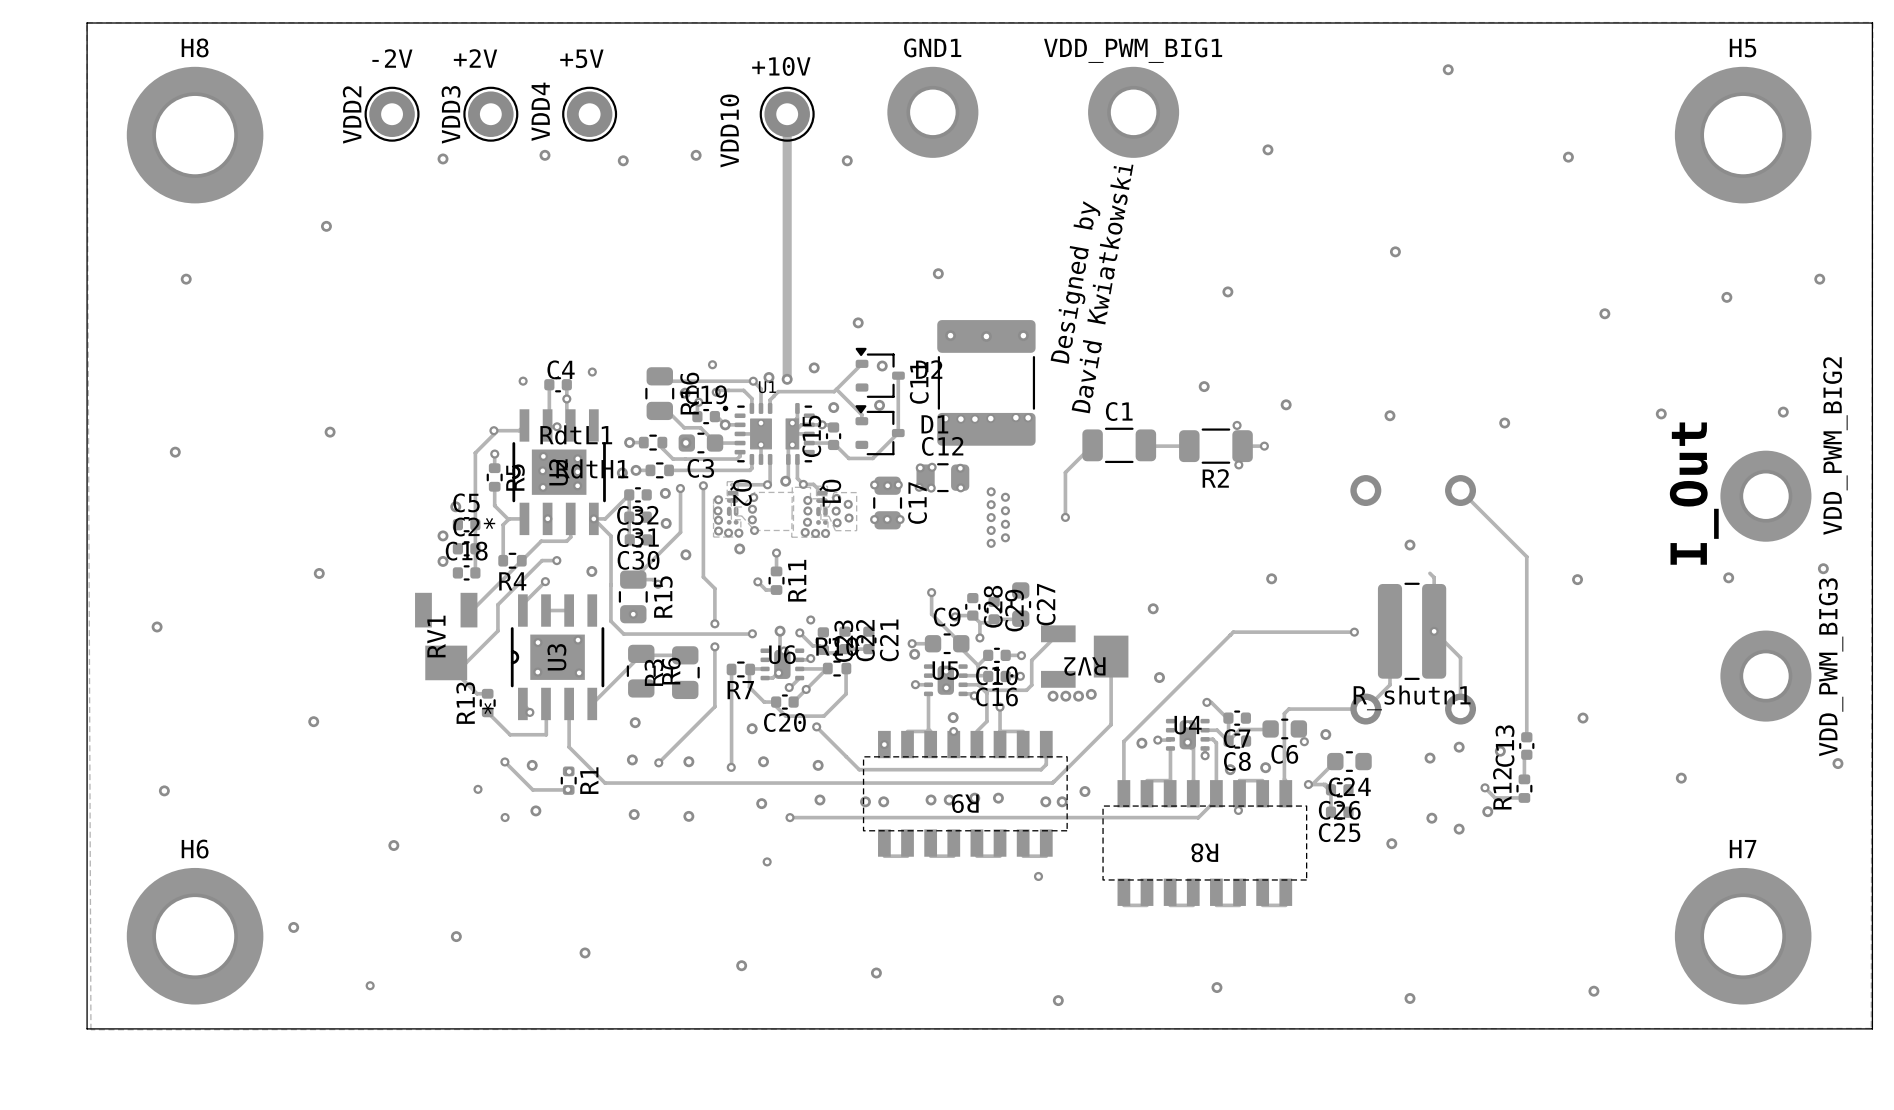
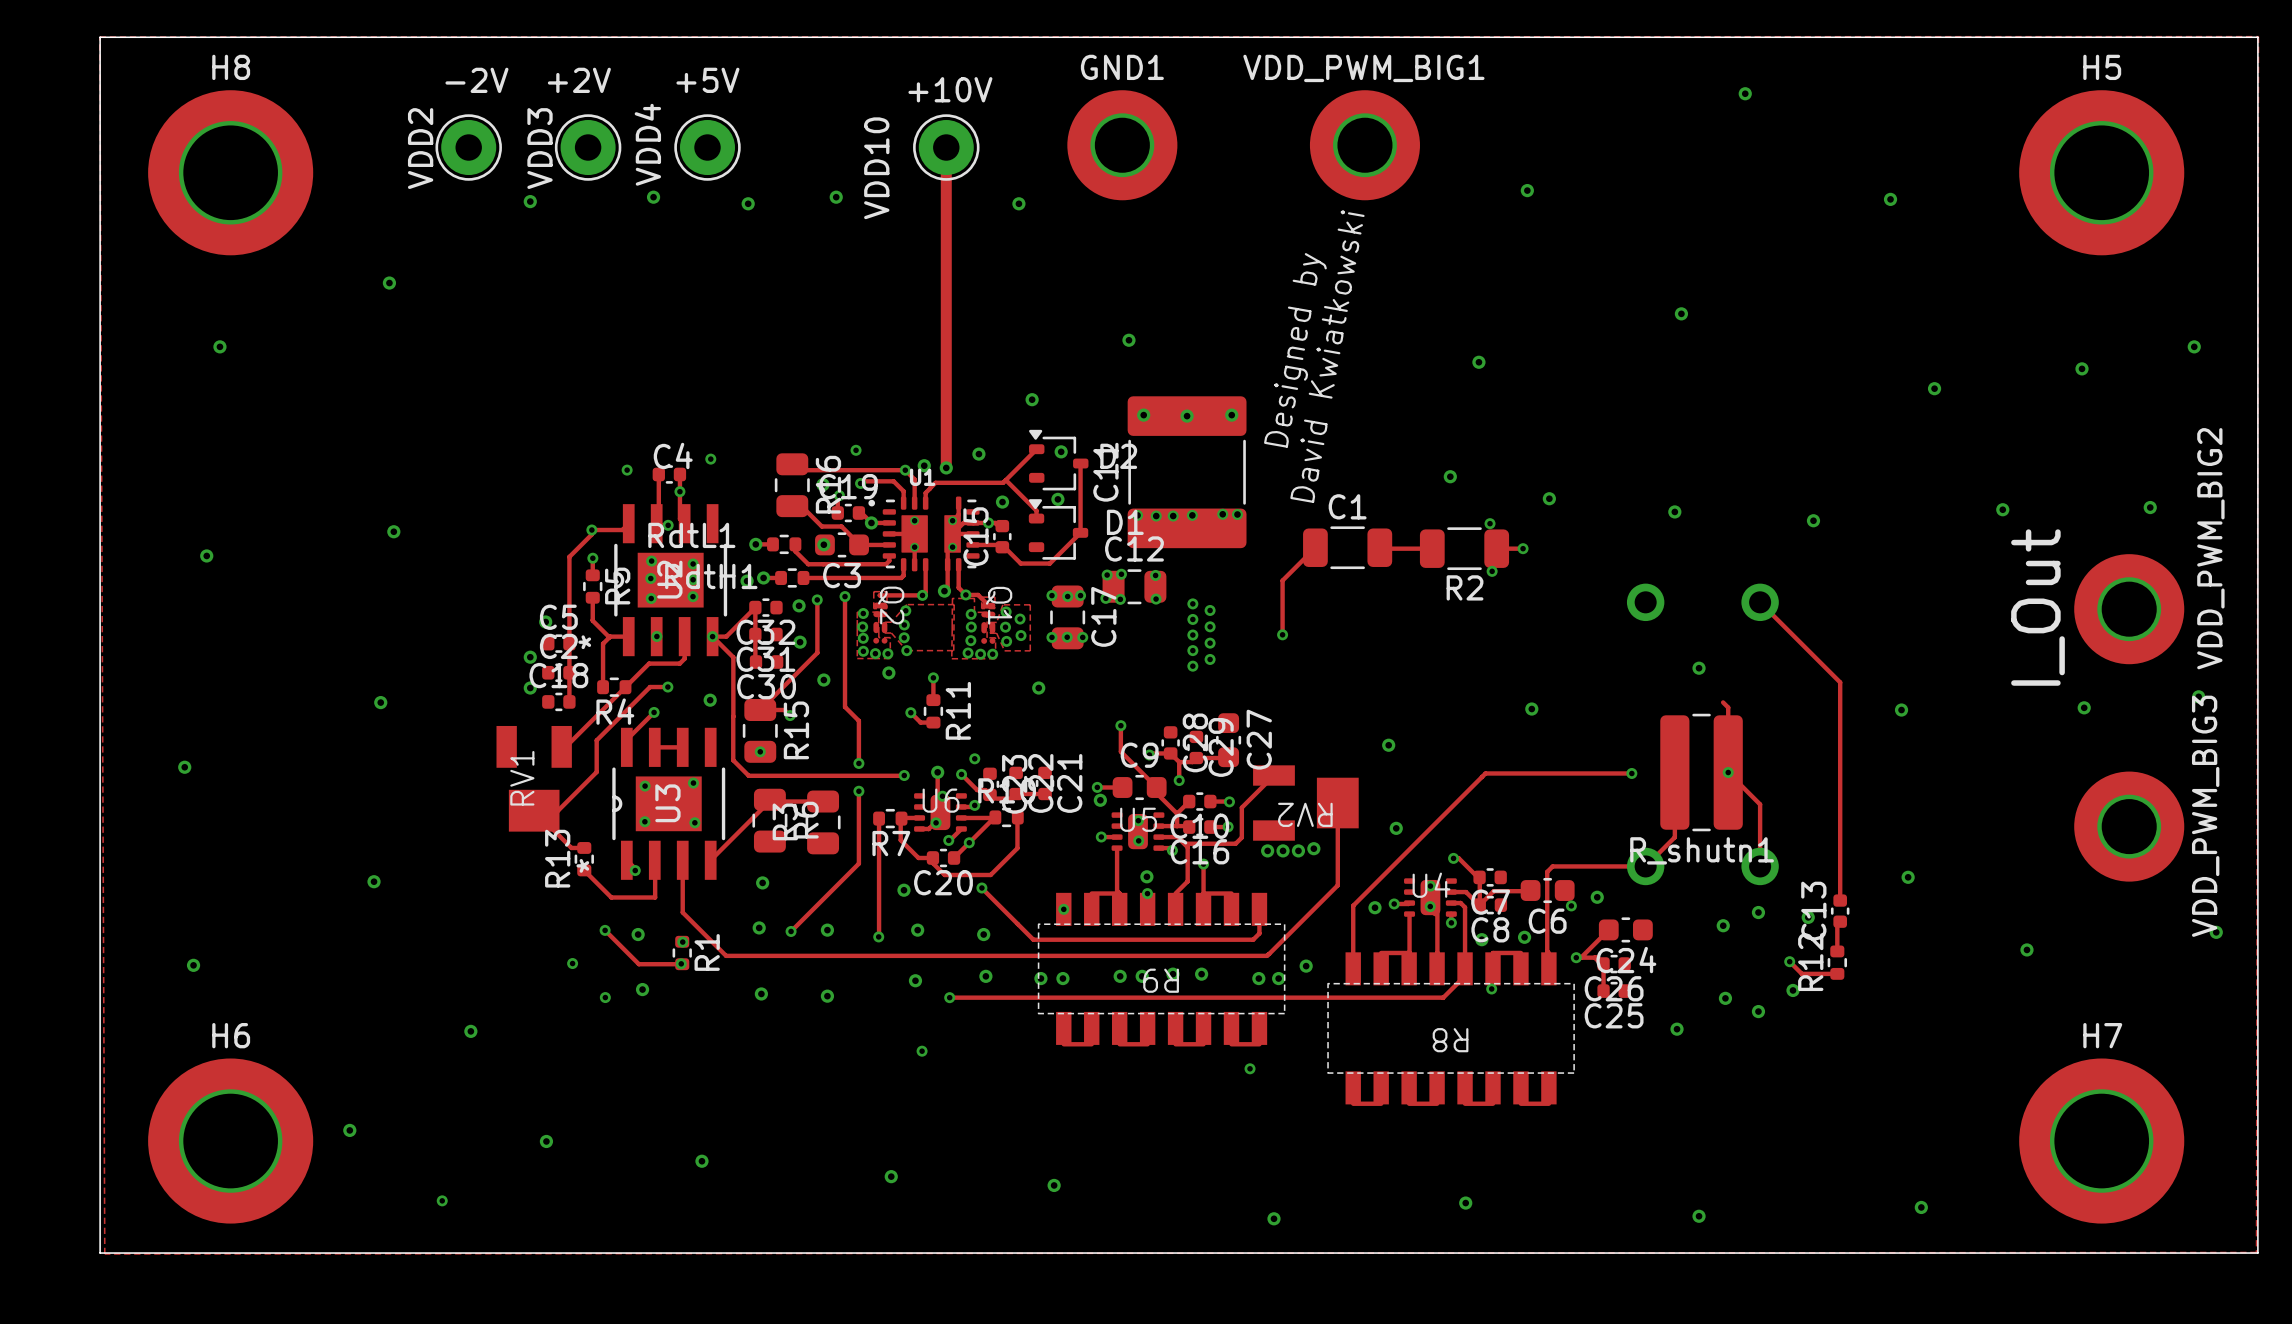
via: none -> (1038, 688)

